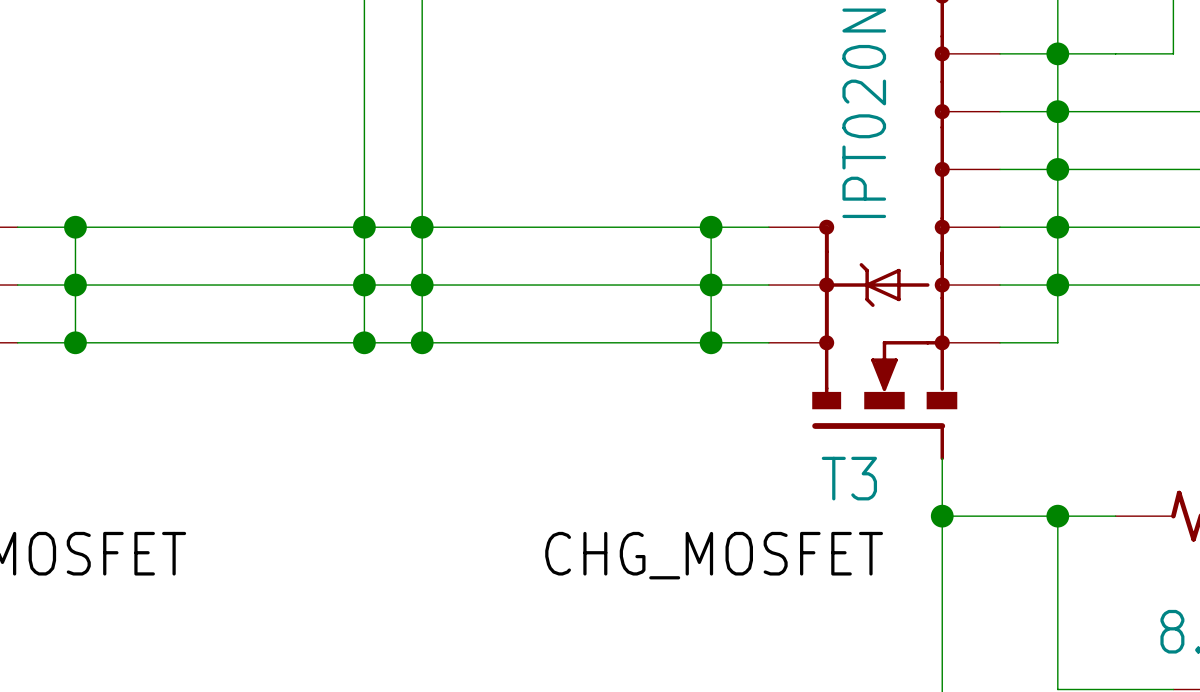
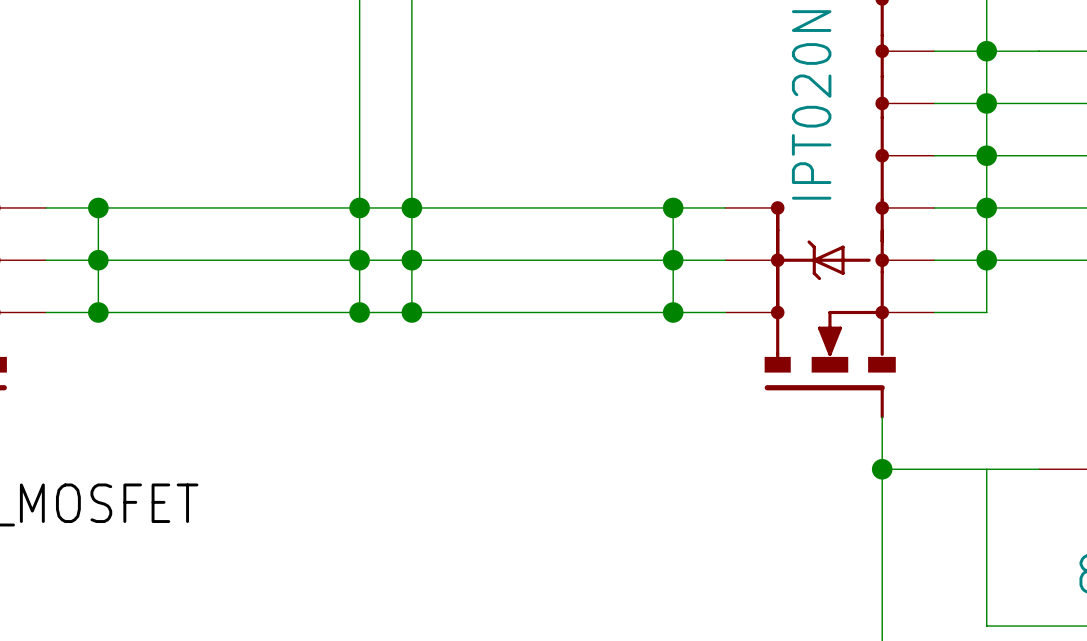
T3 name: T3 (849, 478) -> none
junction: (1057, 516) -> none
label: CHG_MOSFET (714, 555) -> none

